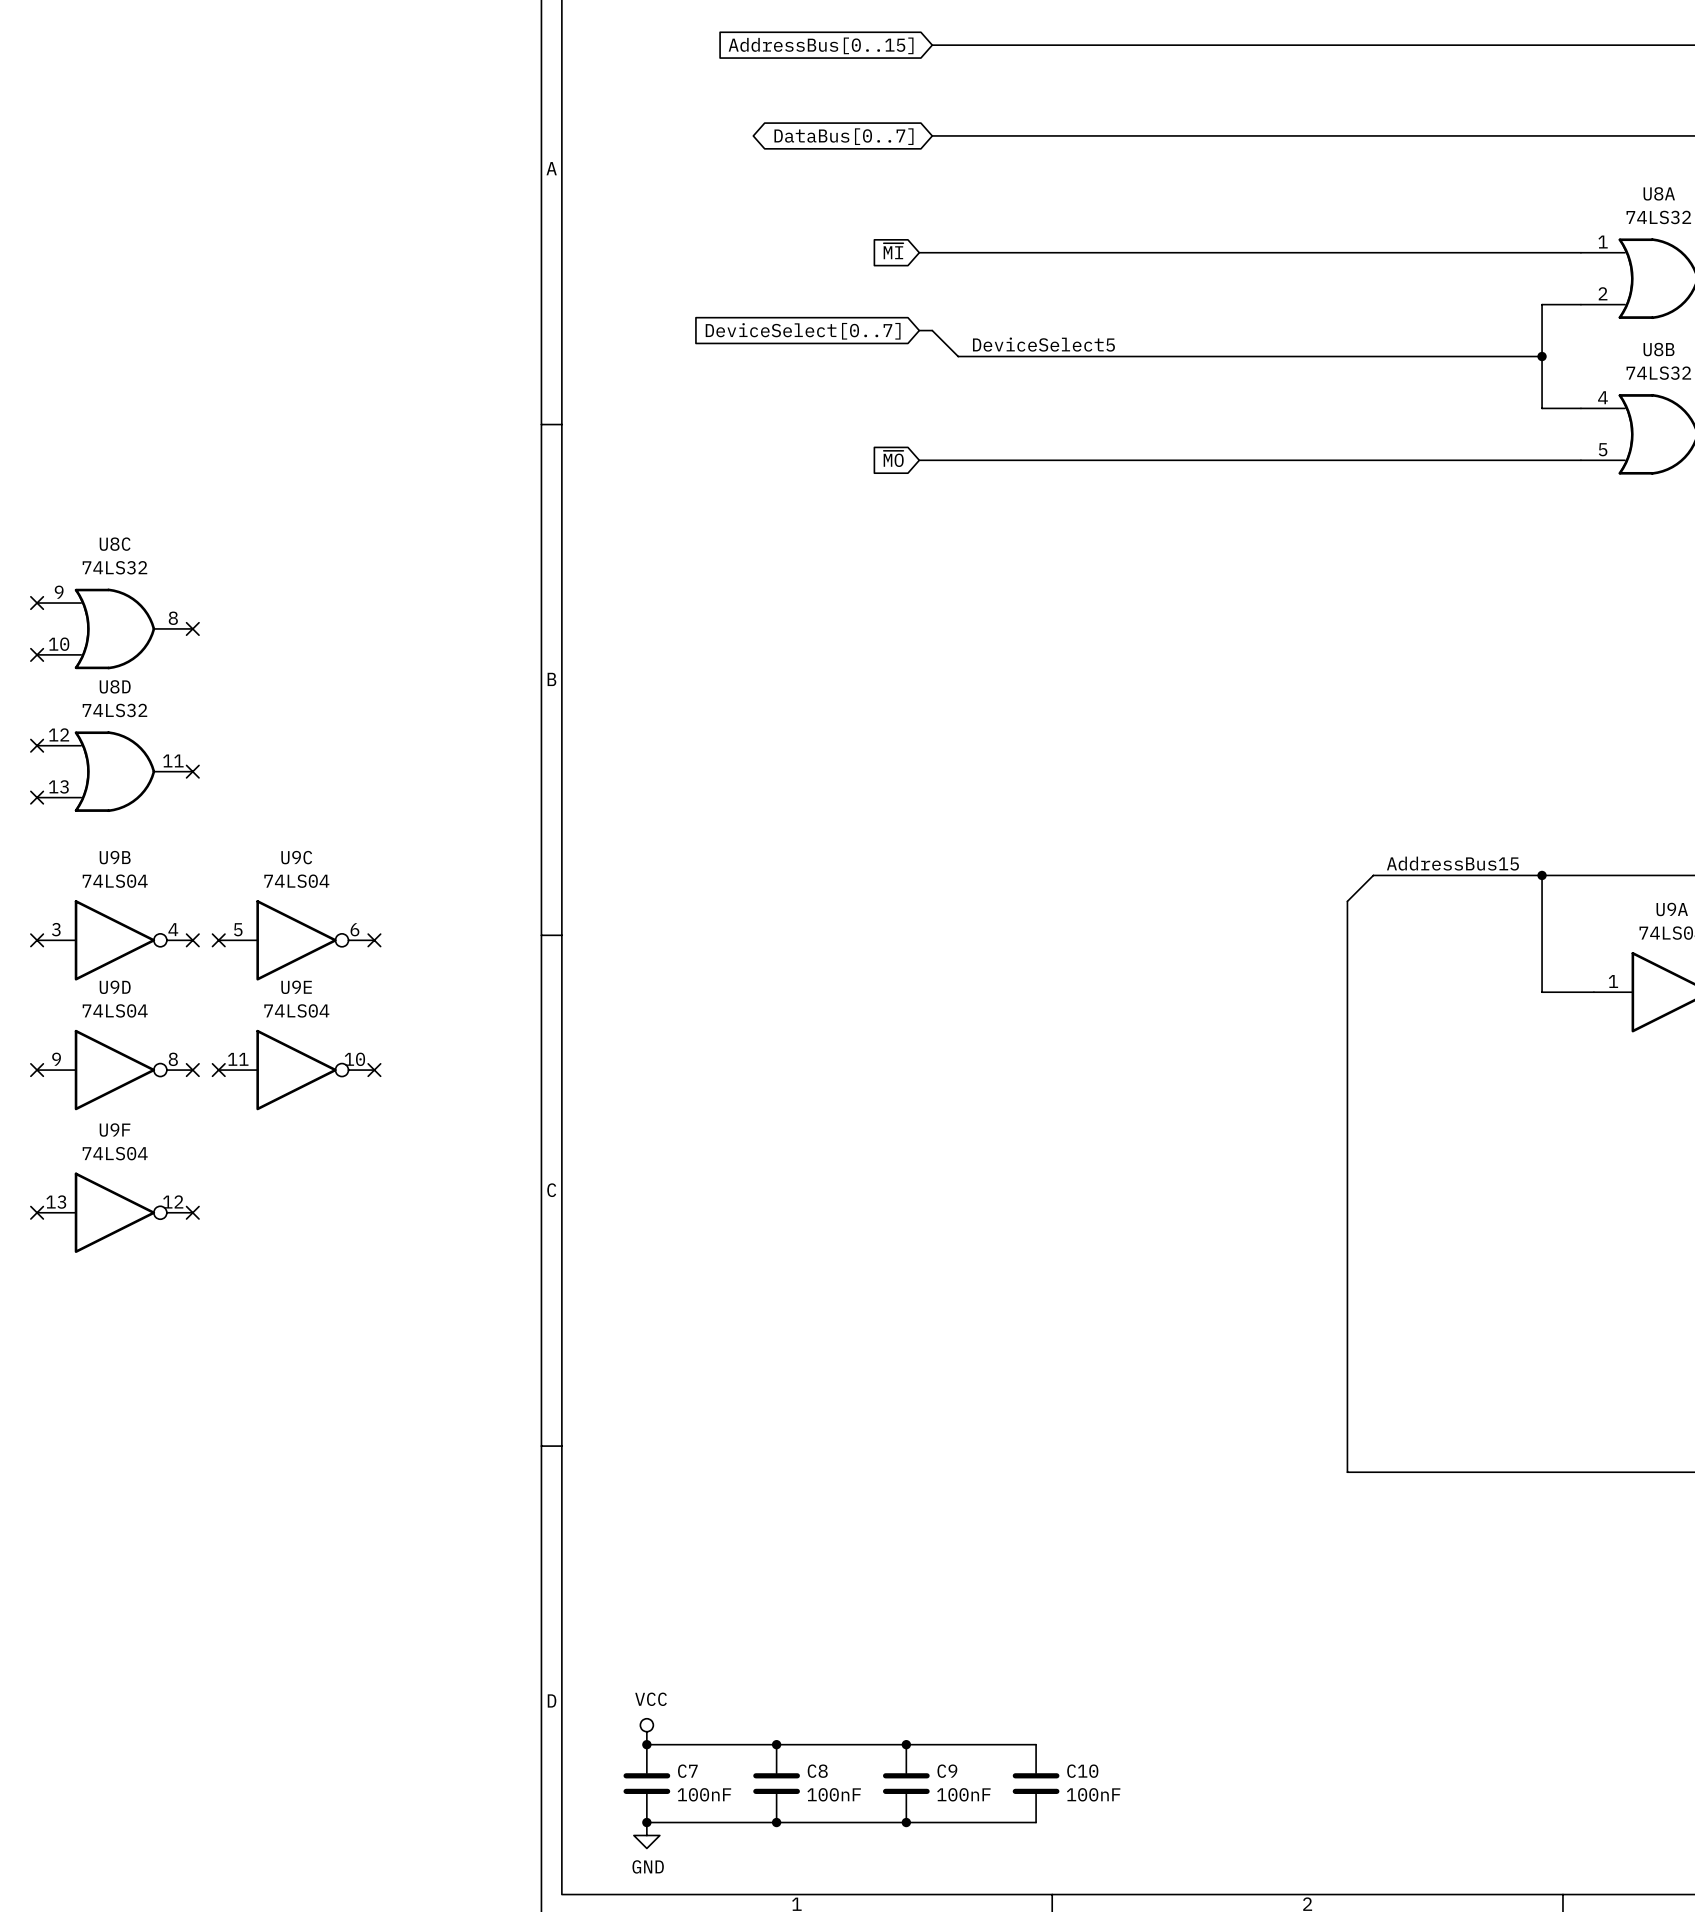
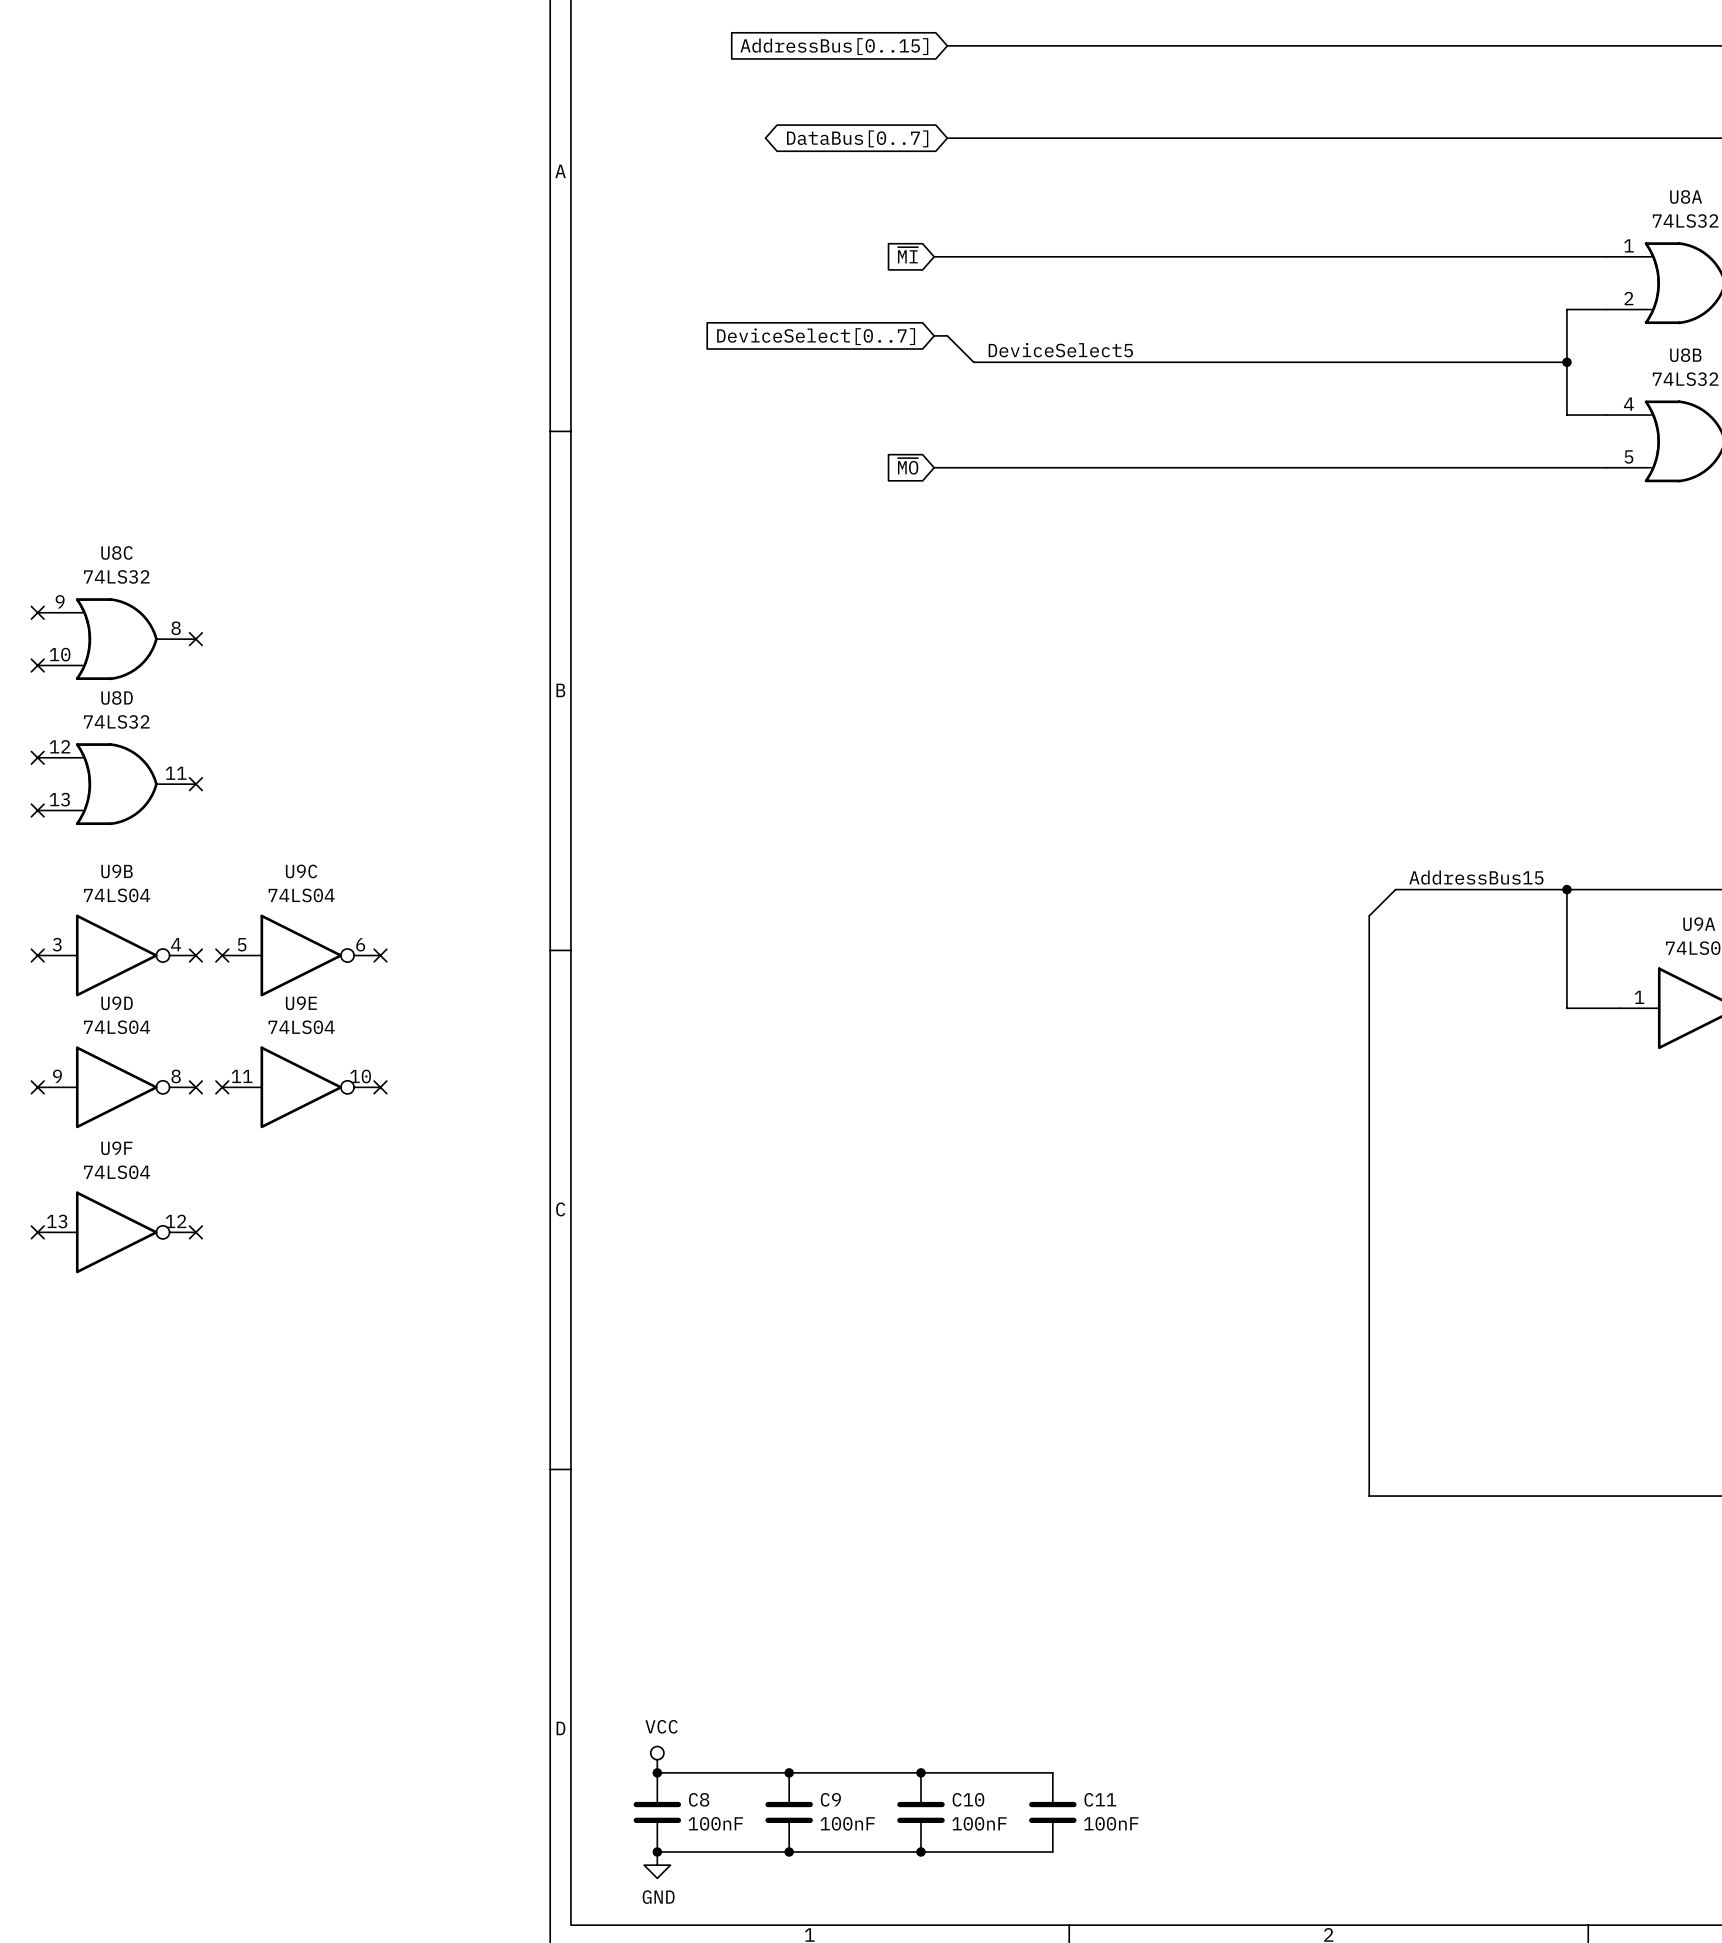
C7 name: C7 (687, 1771) -> C8 (699, 1799)
C8 name: C8 (817, 1771) -> C9 (830, 1799)
C9 name: C9 (947, 1771) -> C10 (968, 1799)
C10 name: C10 (1082, 1771) -> C11 (1100, 1799)

